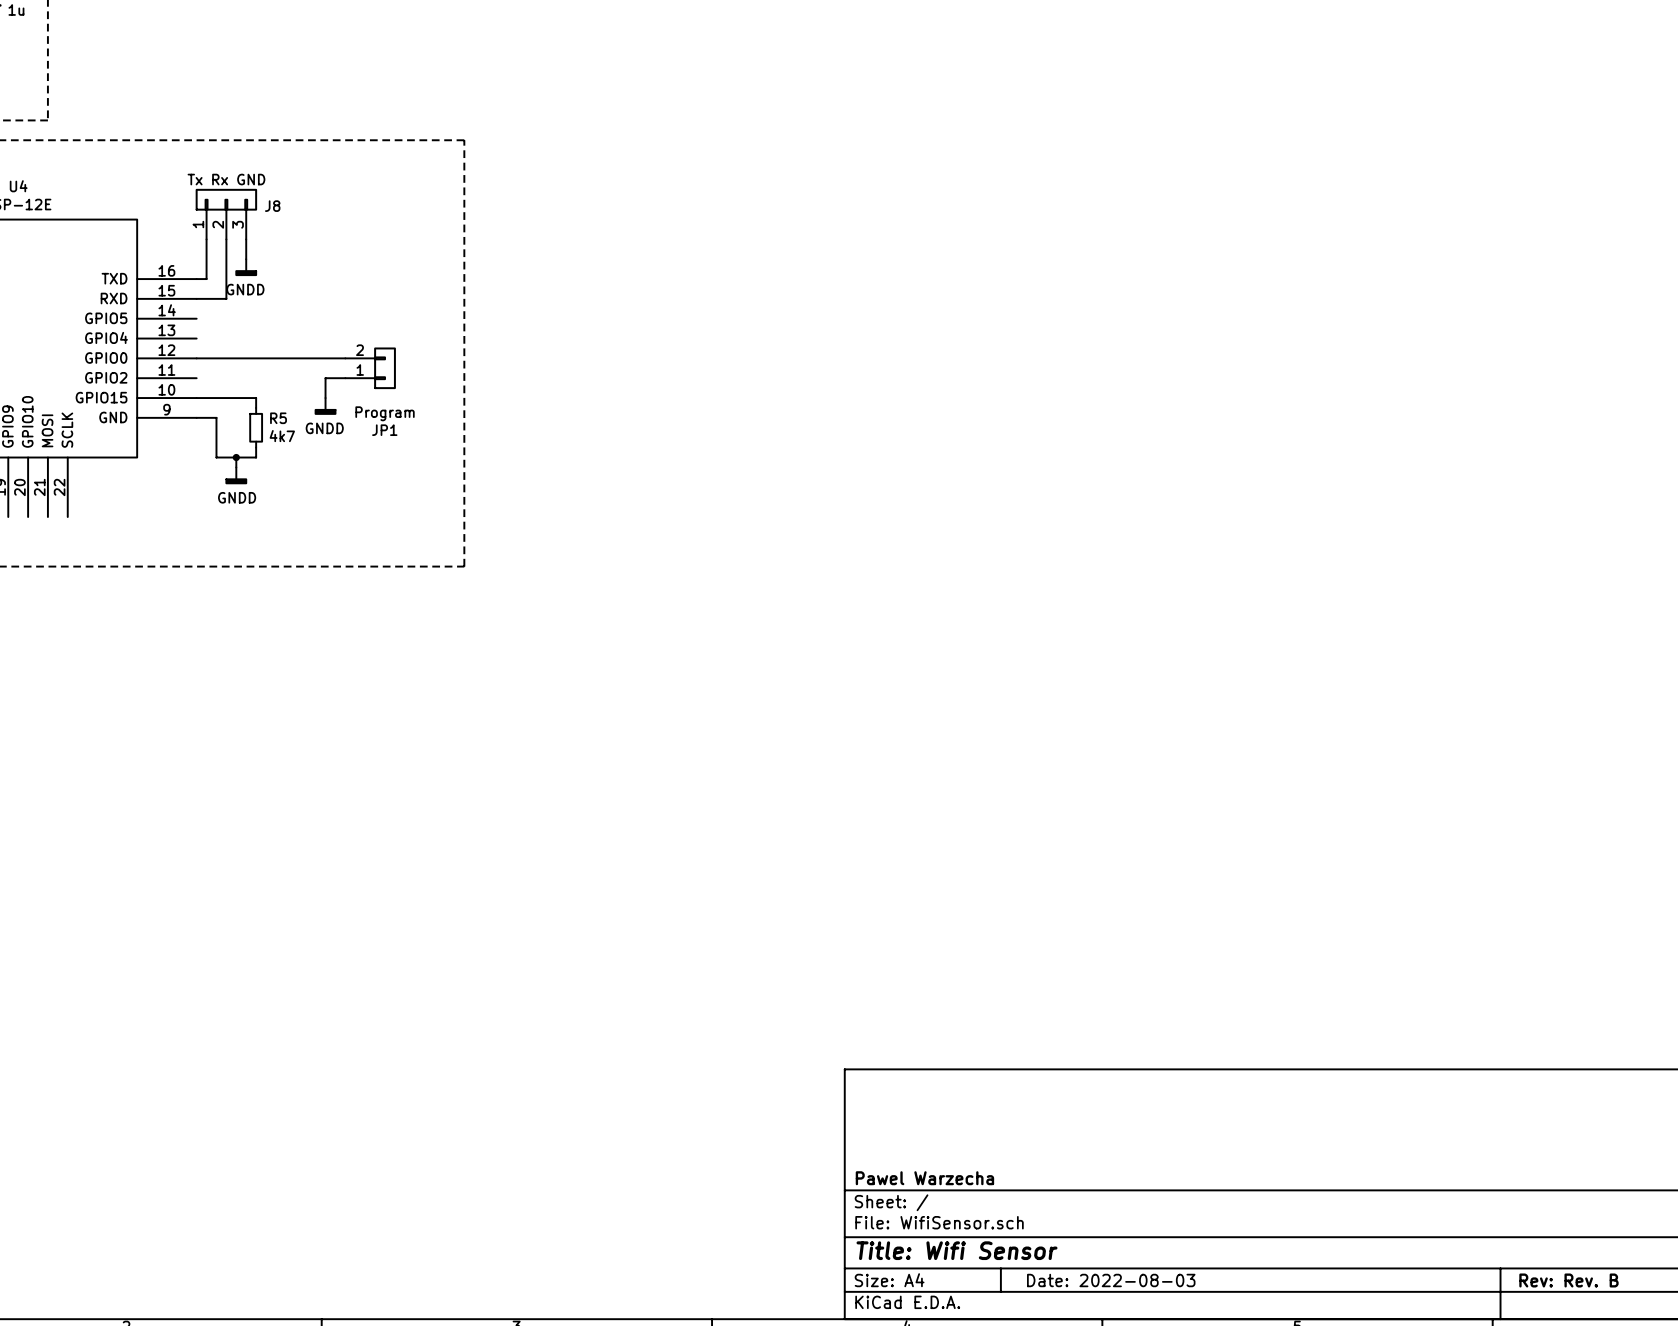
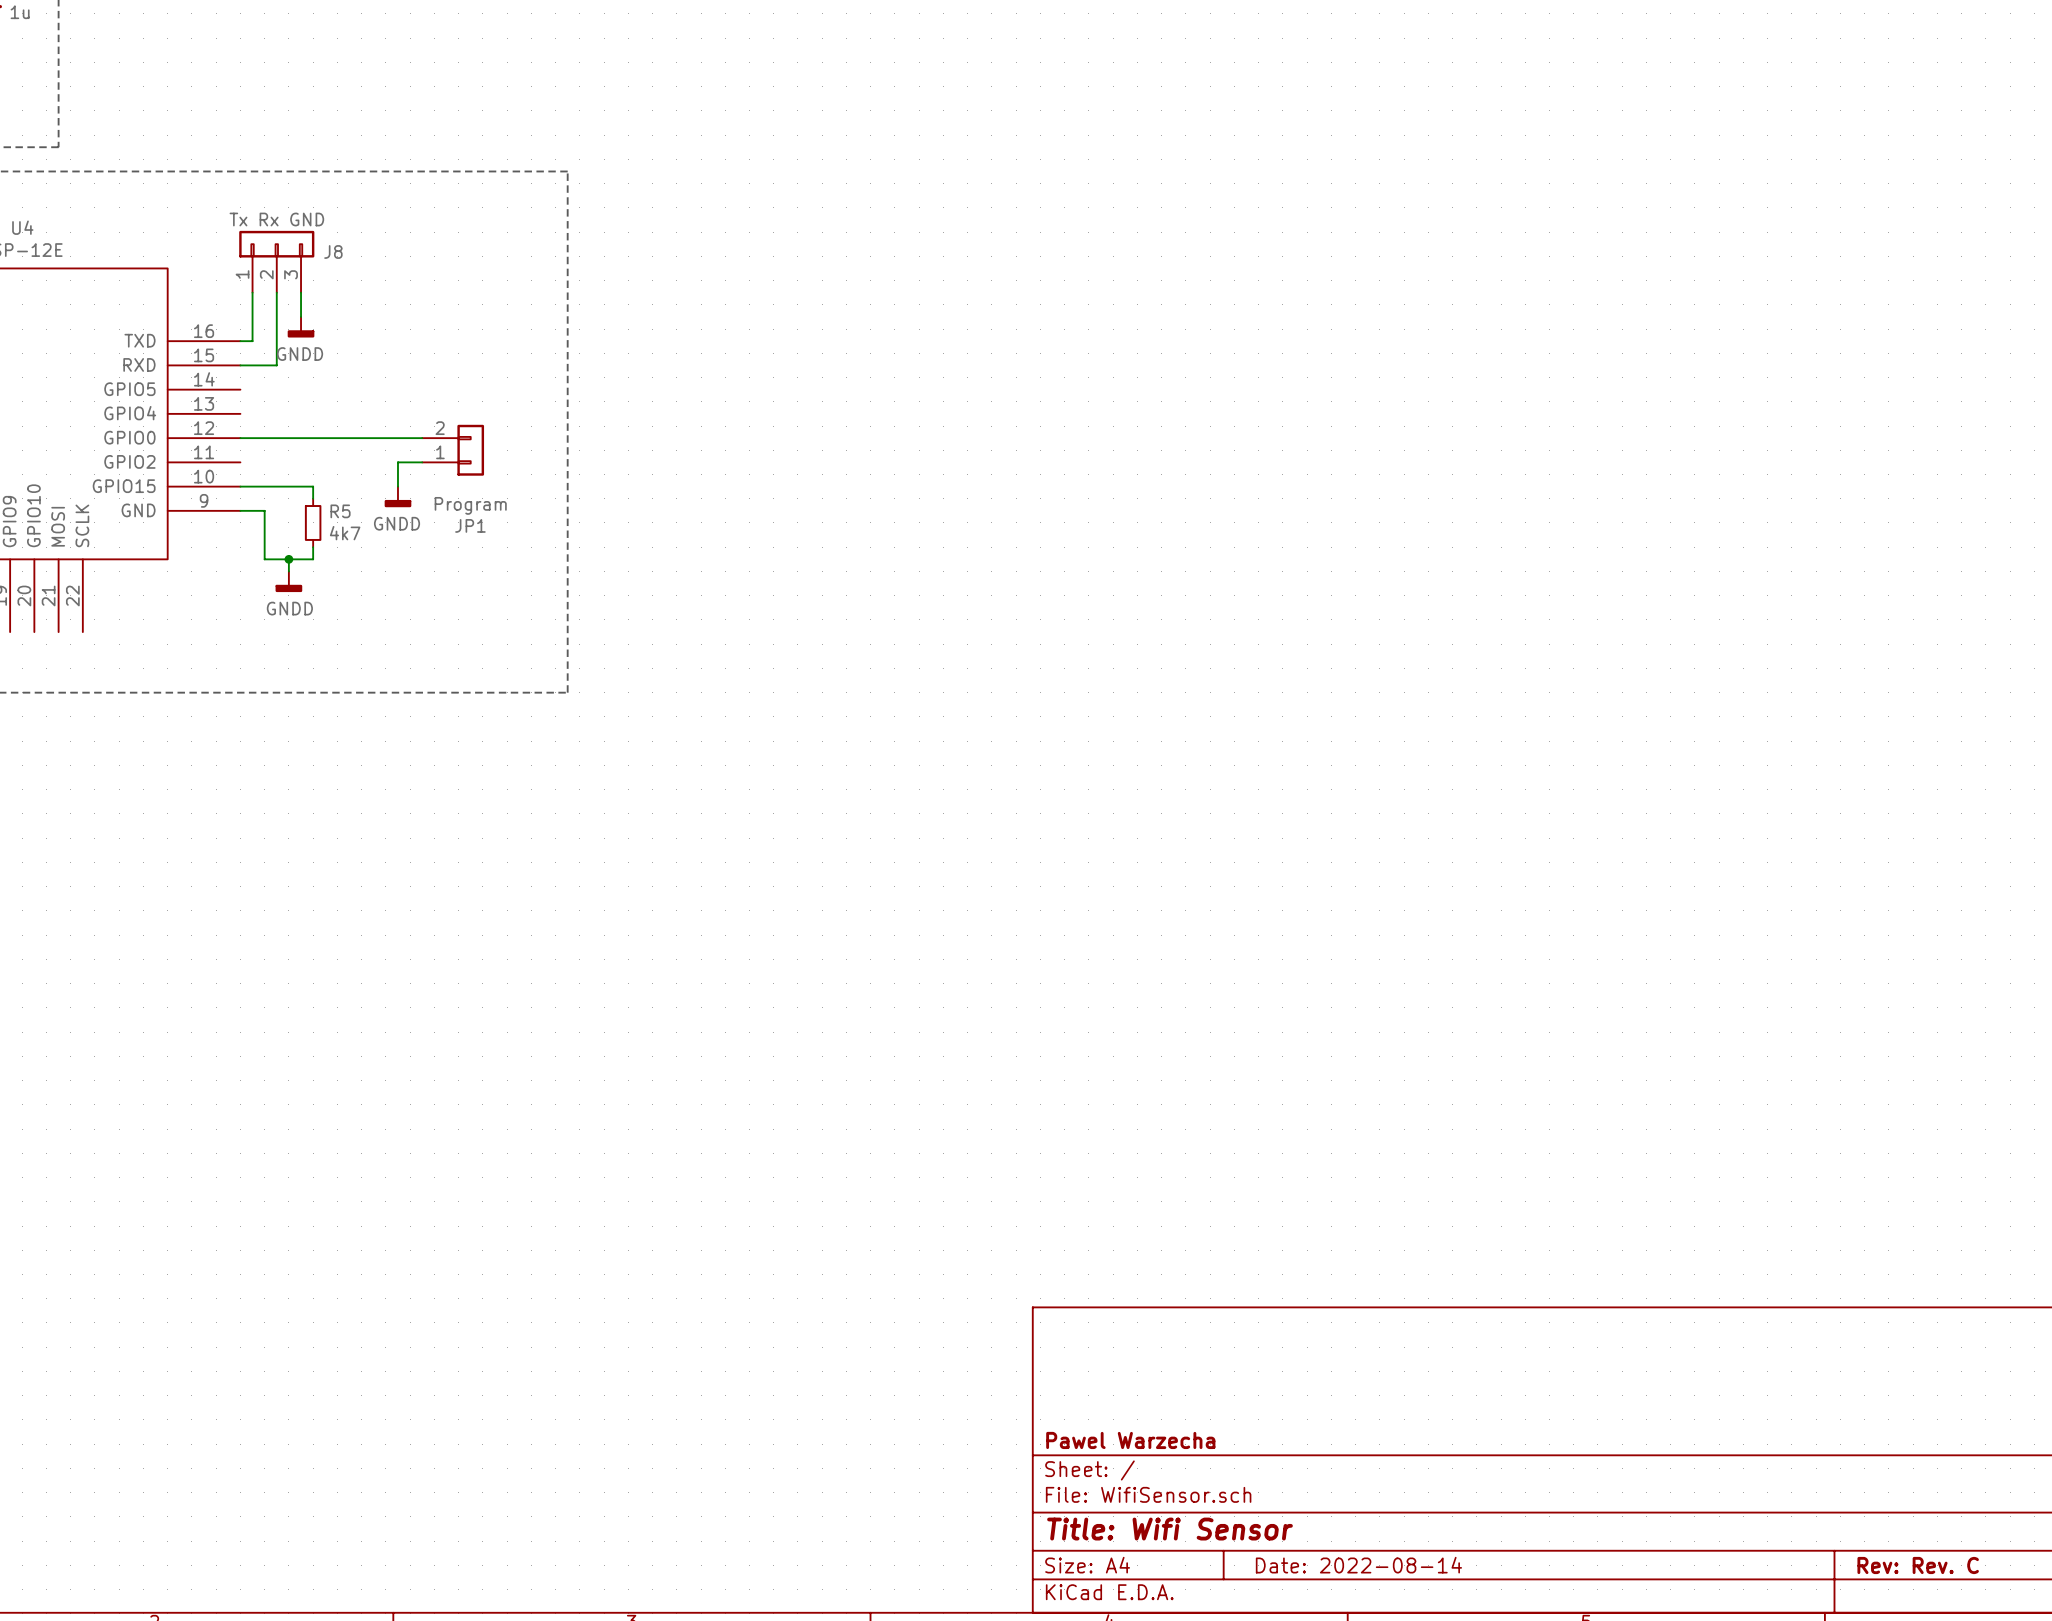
title block: Date: 2022-08-03 (1111, 1280) -> Date: 2022-08-14 (1358, 1565)
title block: Rev: Rev. B (1568, 1280) -> Rev: Rev. C (1918, 1565)

